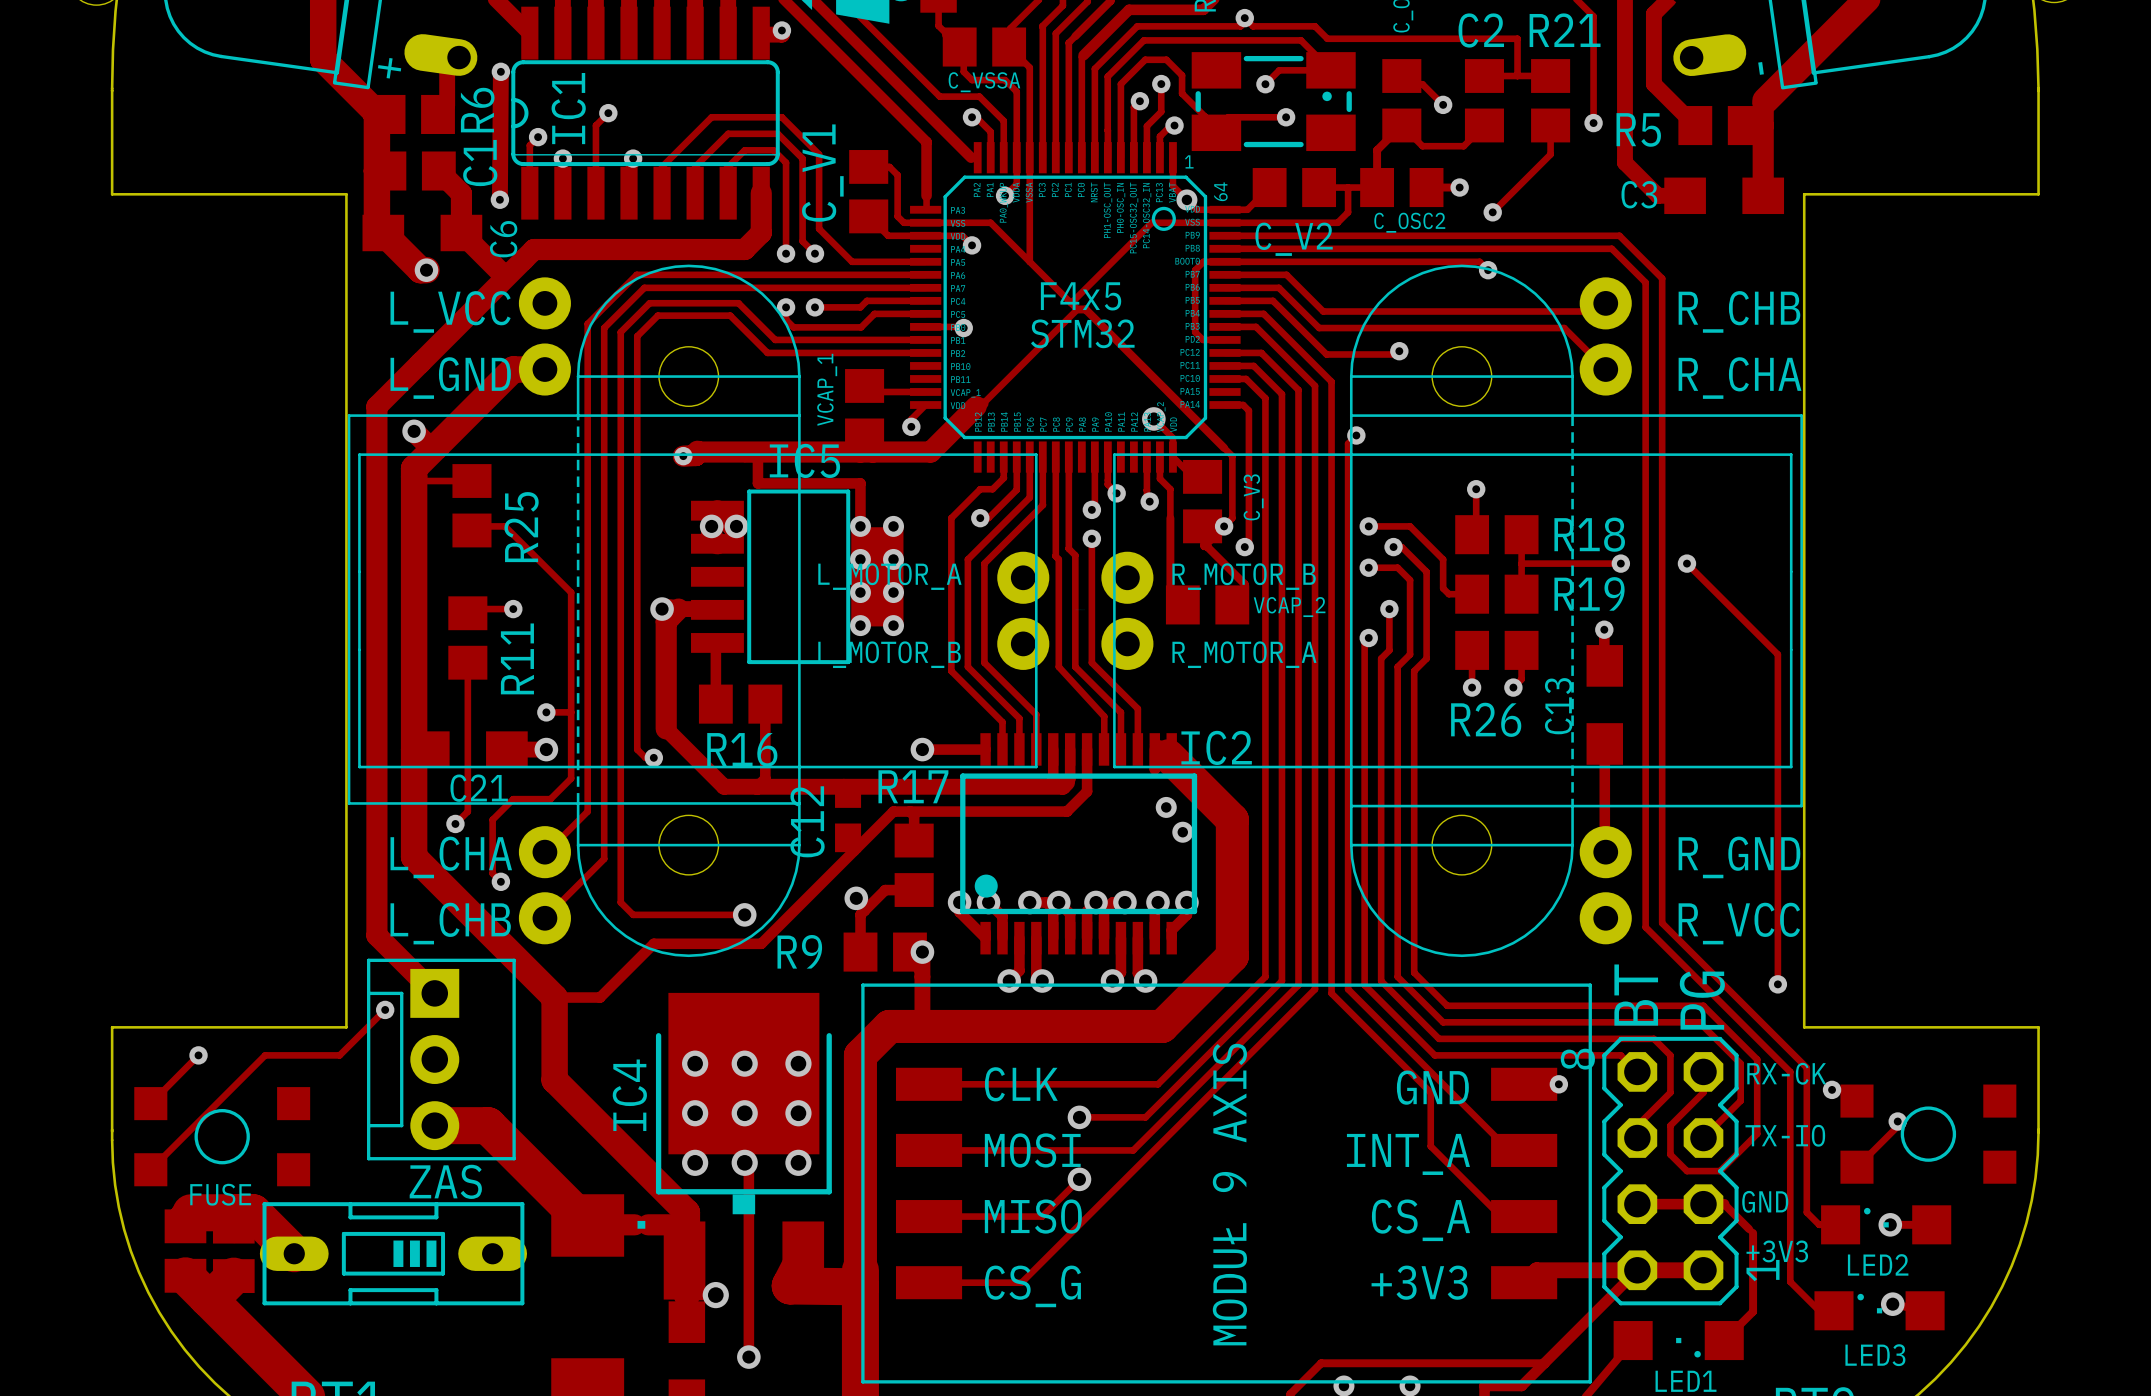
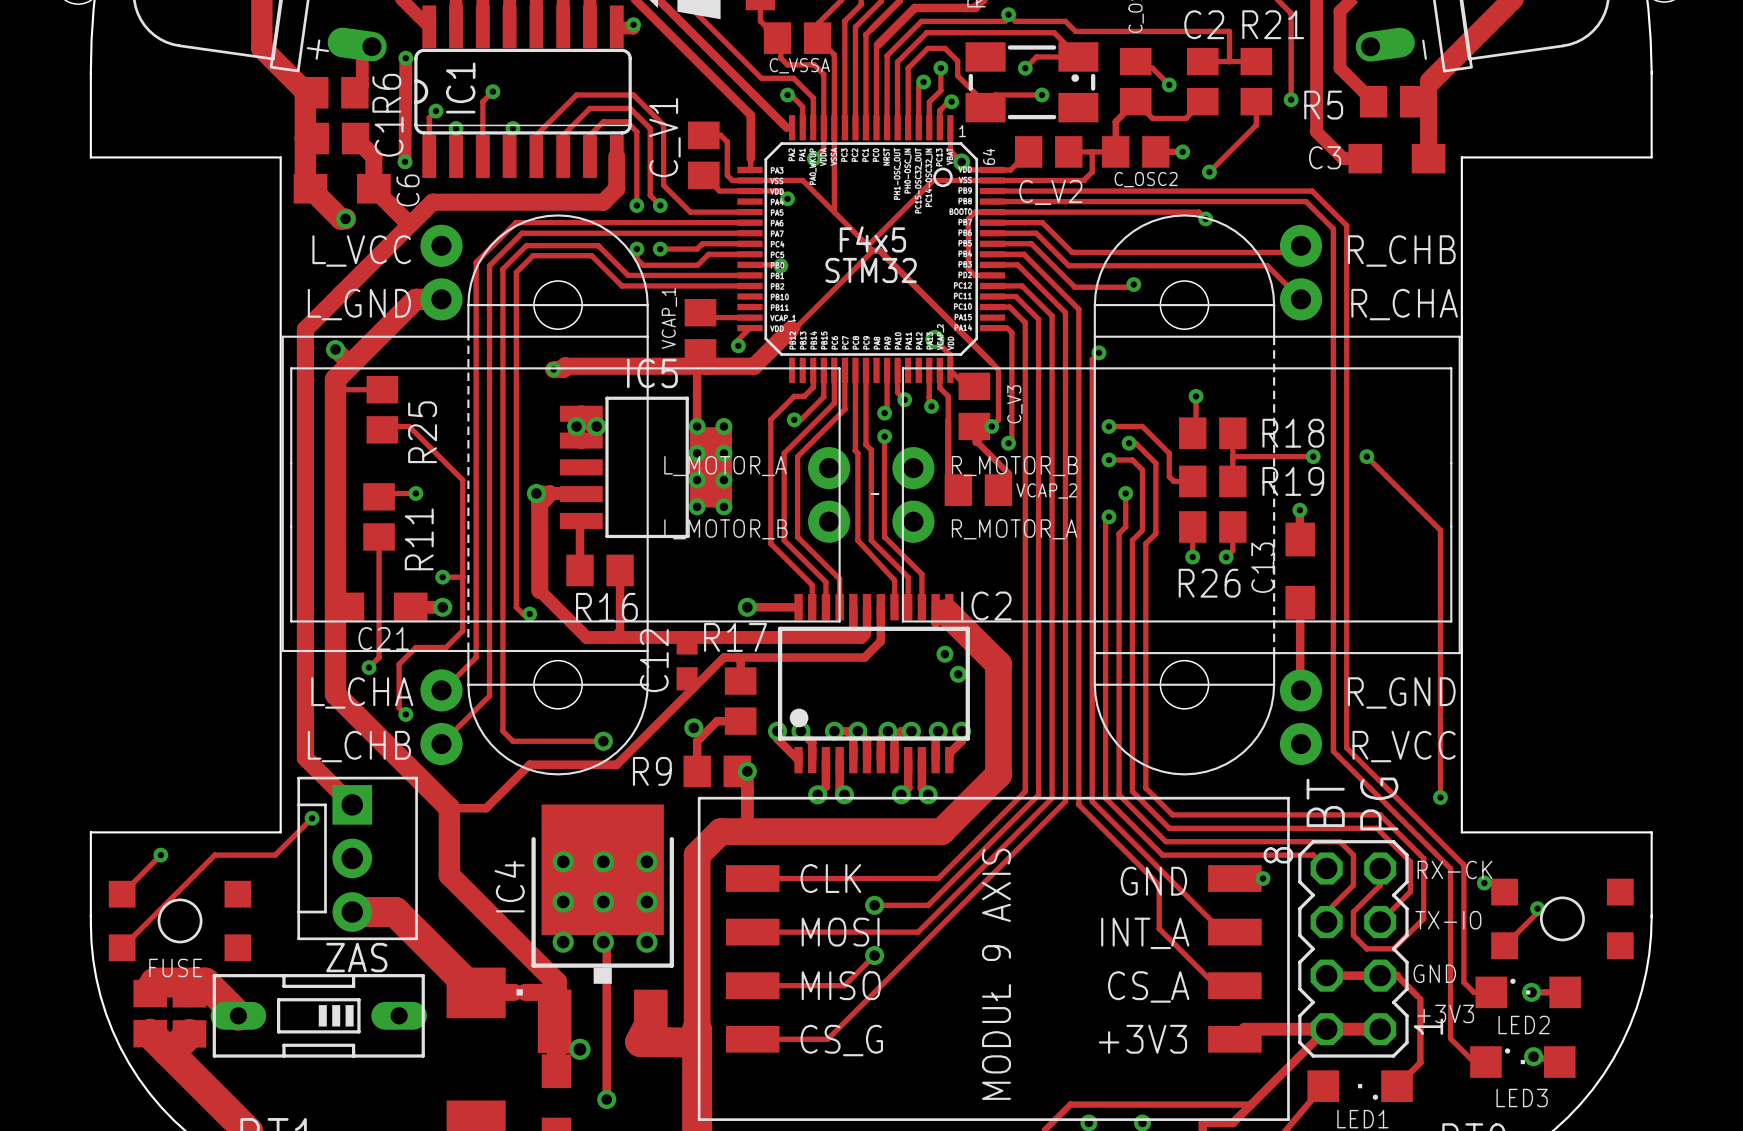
track: (863, 452) (863, 450) (744, 450) (744, 456) (757, 456) (757, 483) (860, 483) -> (697, 366) (697, 391)

